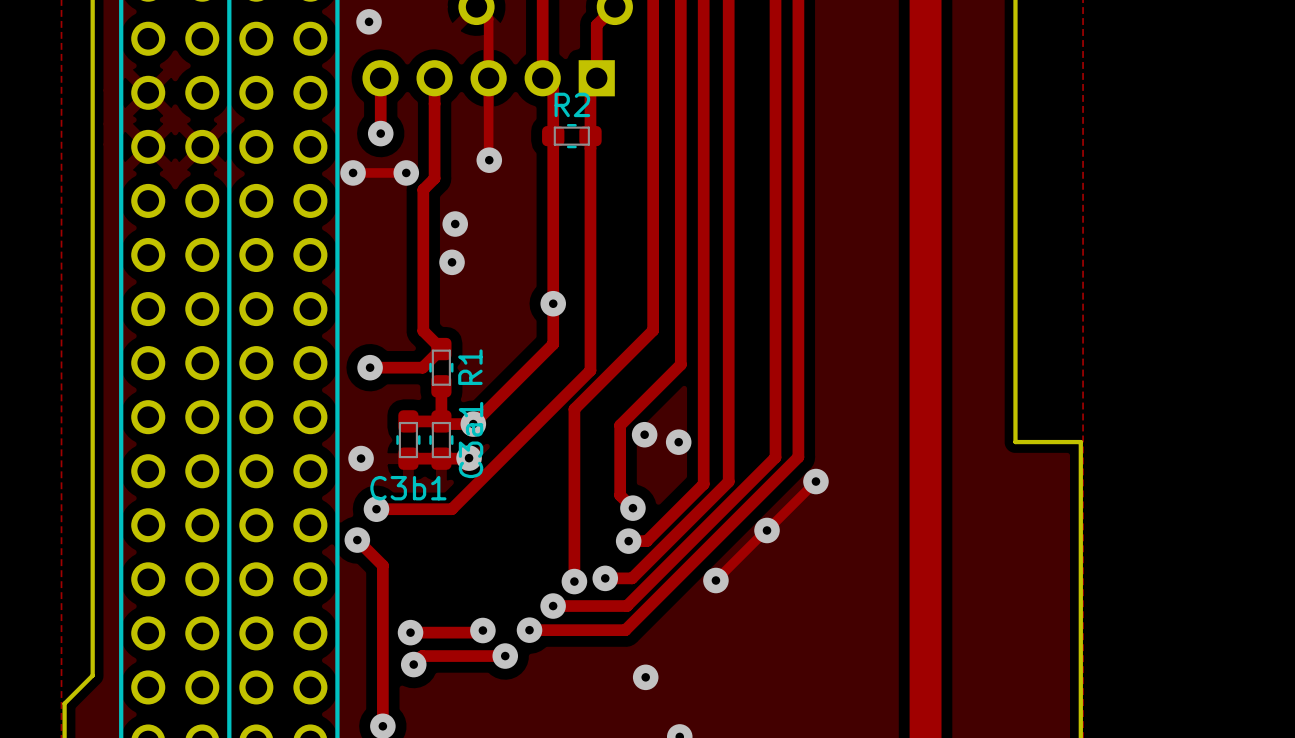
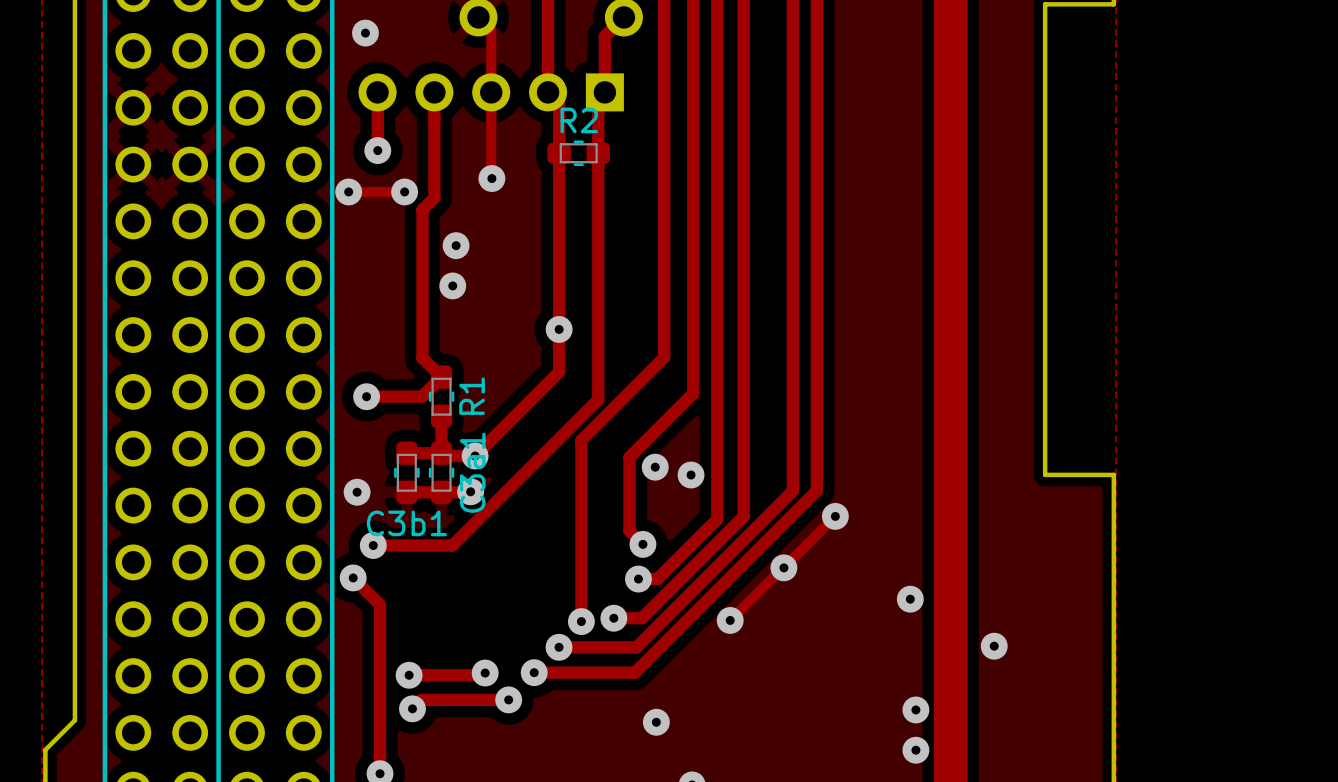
via: none -> (910, 599)
via: none -> (994, 646)
via: none -> (915, 709)
via: none -> (915, 750)

